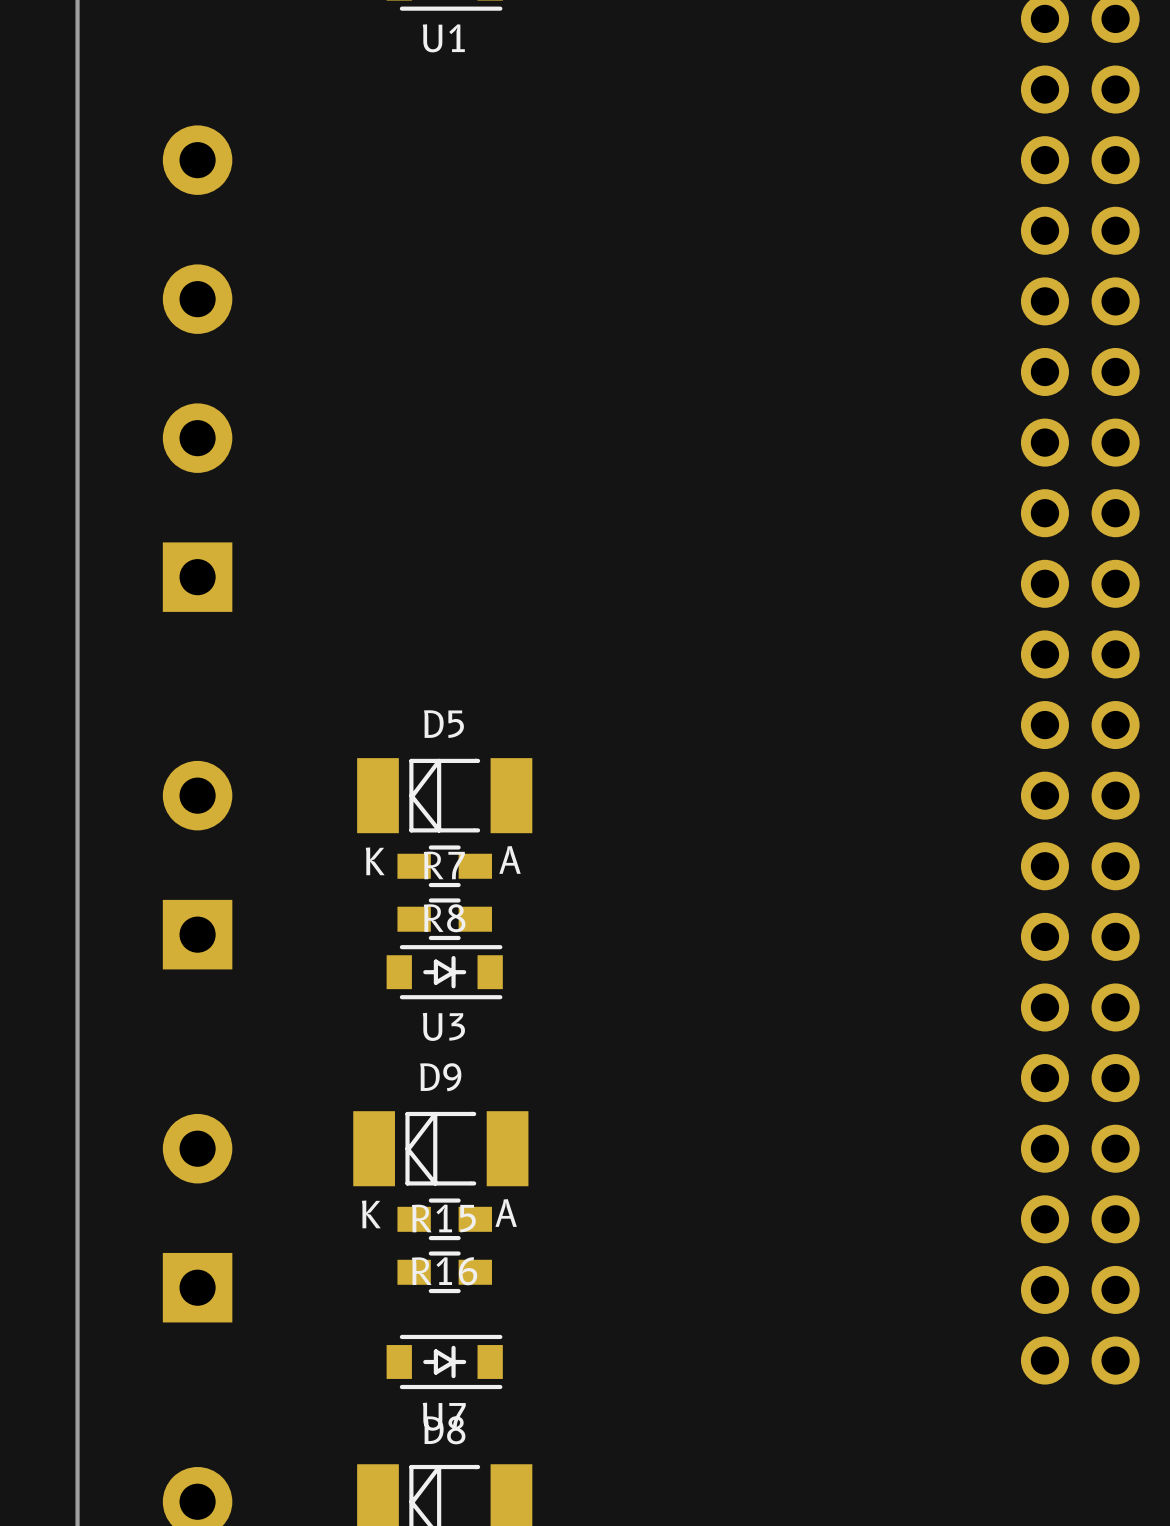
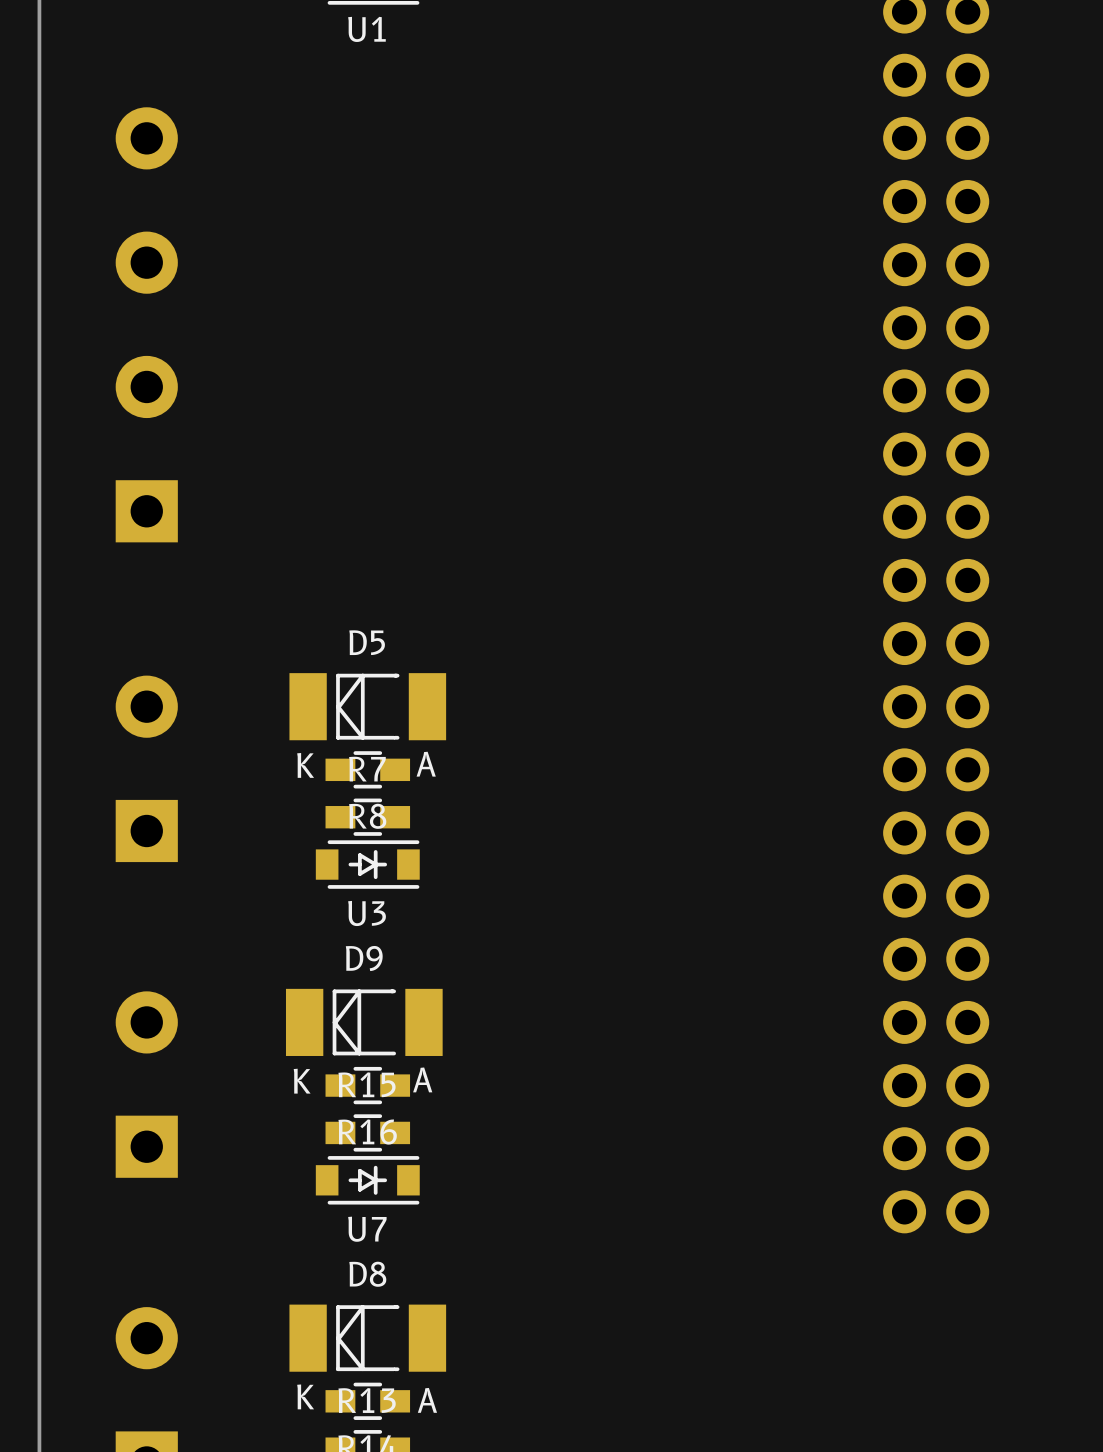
U7 position: (444, 1361) -> (367, 1180)

